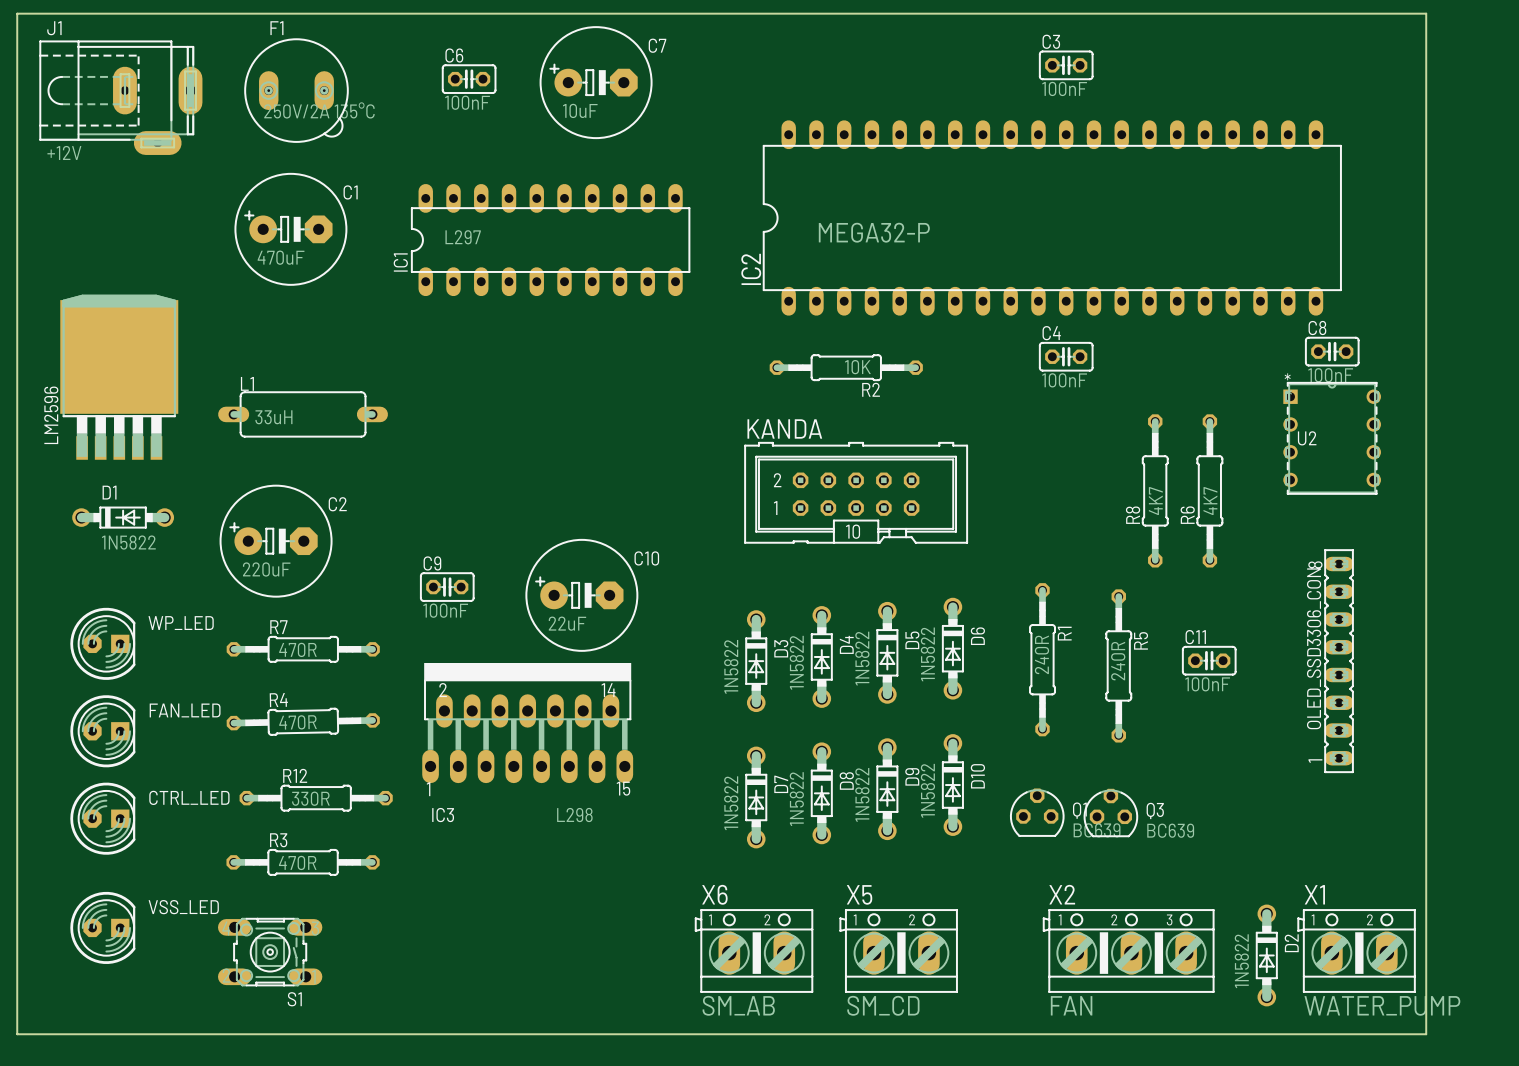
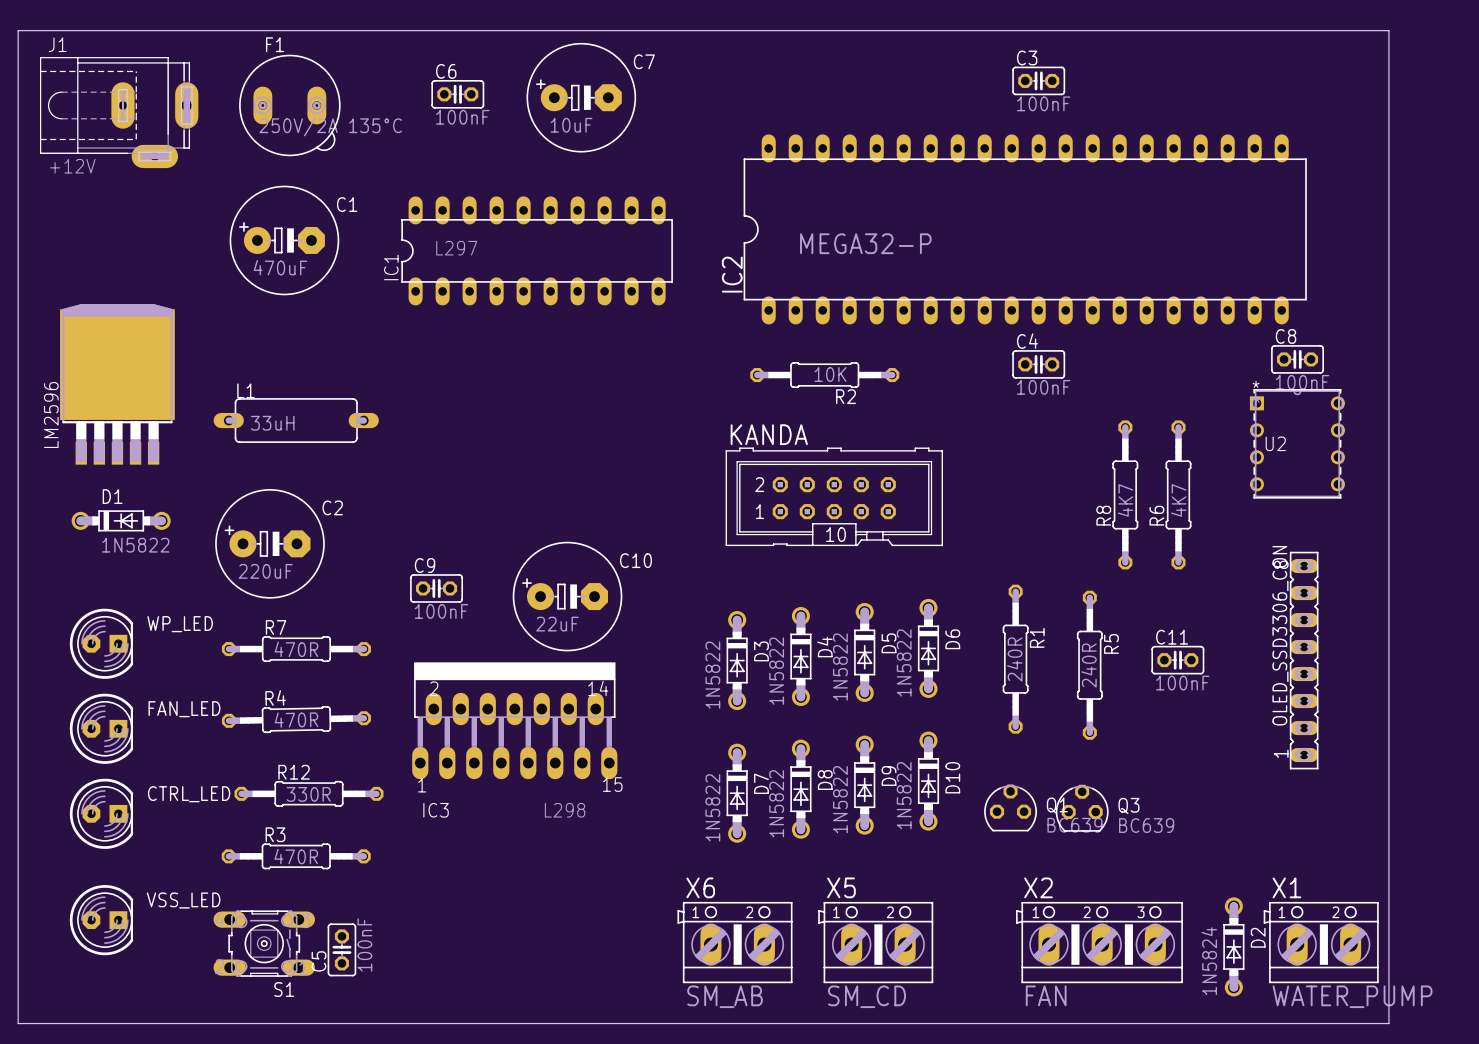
C5: none -> 100nF (341, 949)
D2 value: 1N5822 (1241, 961) -> 1N5824 (1209, 961)

